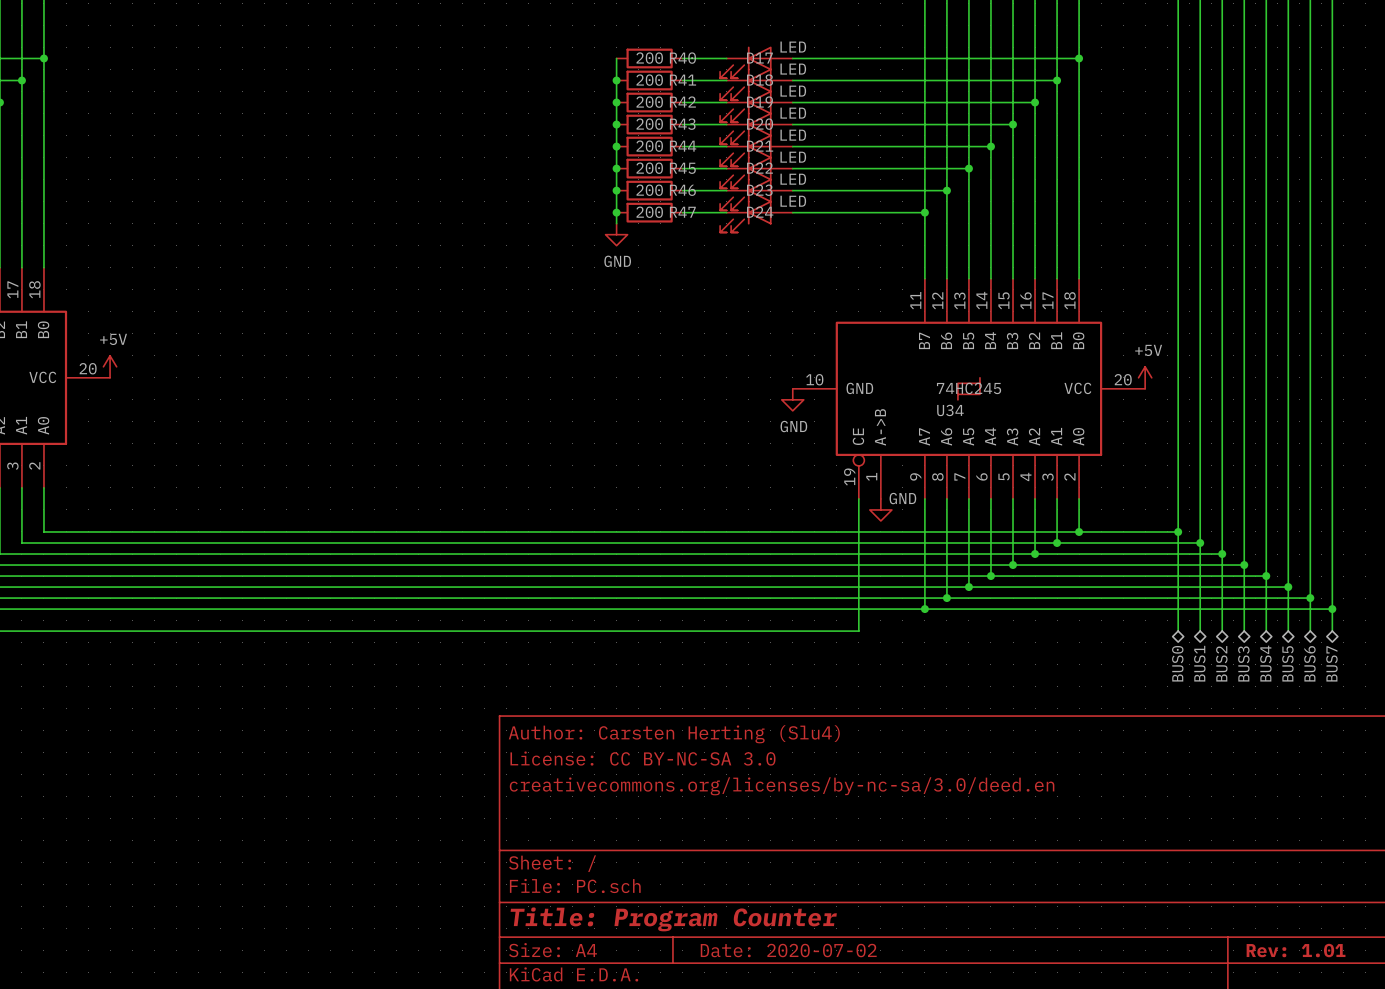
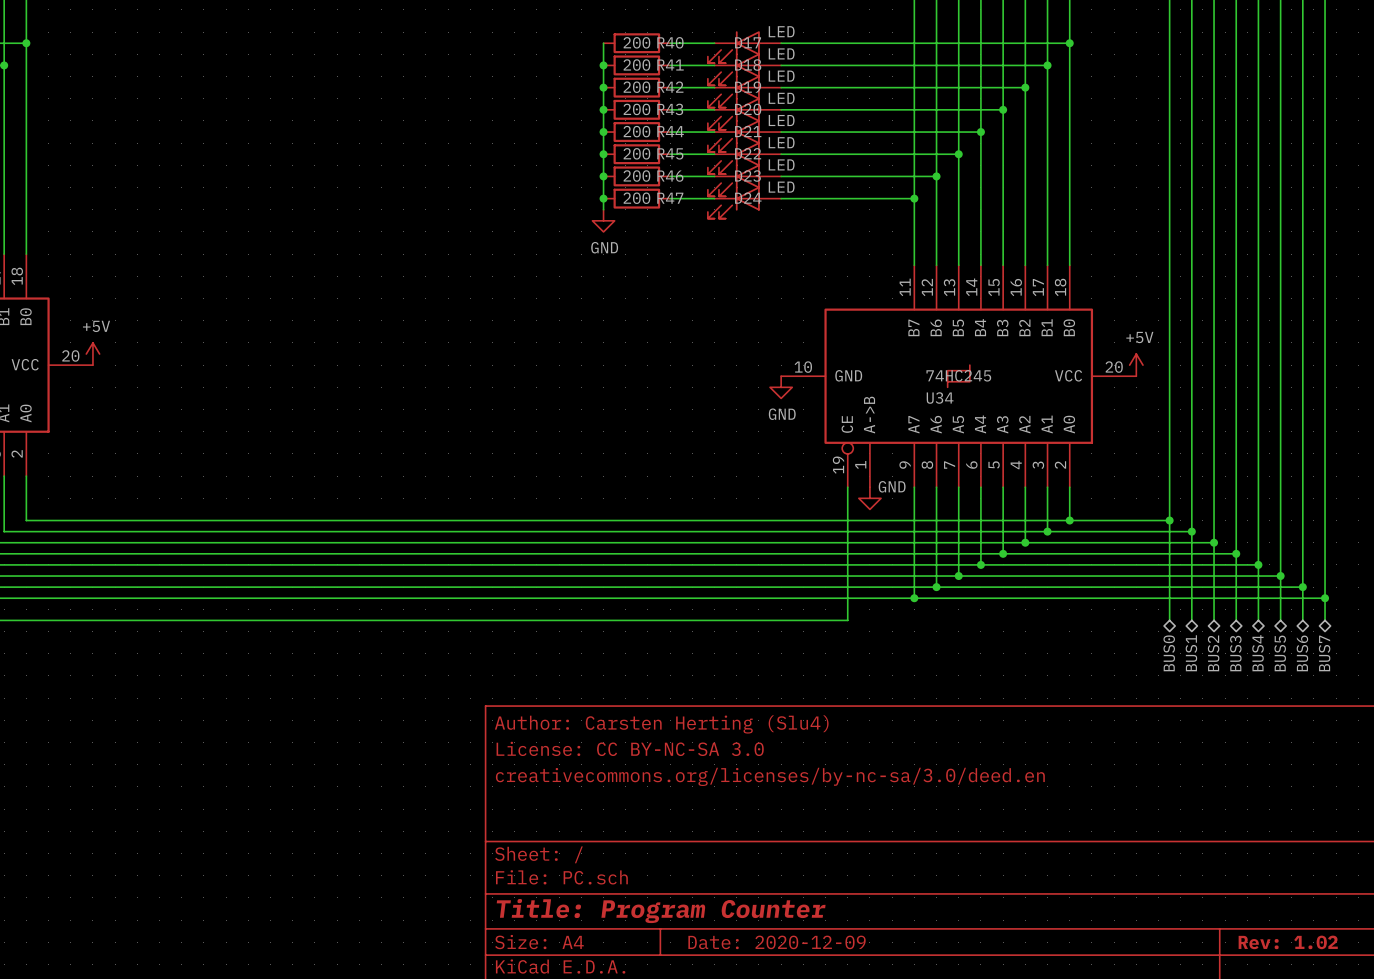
title block: Date: 2020-07-02 (788, 950) -> Date: 2020-12-09 (777, 942)
title block: Rev: 1.01 (1296, 950) -> Rev: 1.02 (1288, 942)

